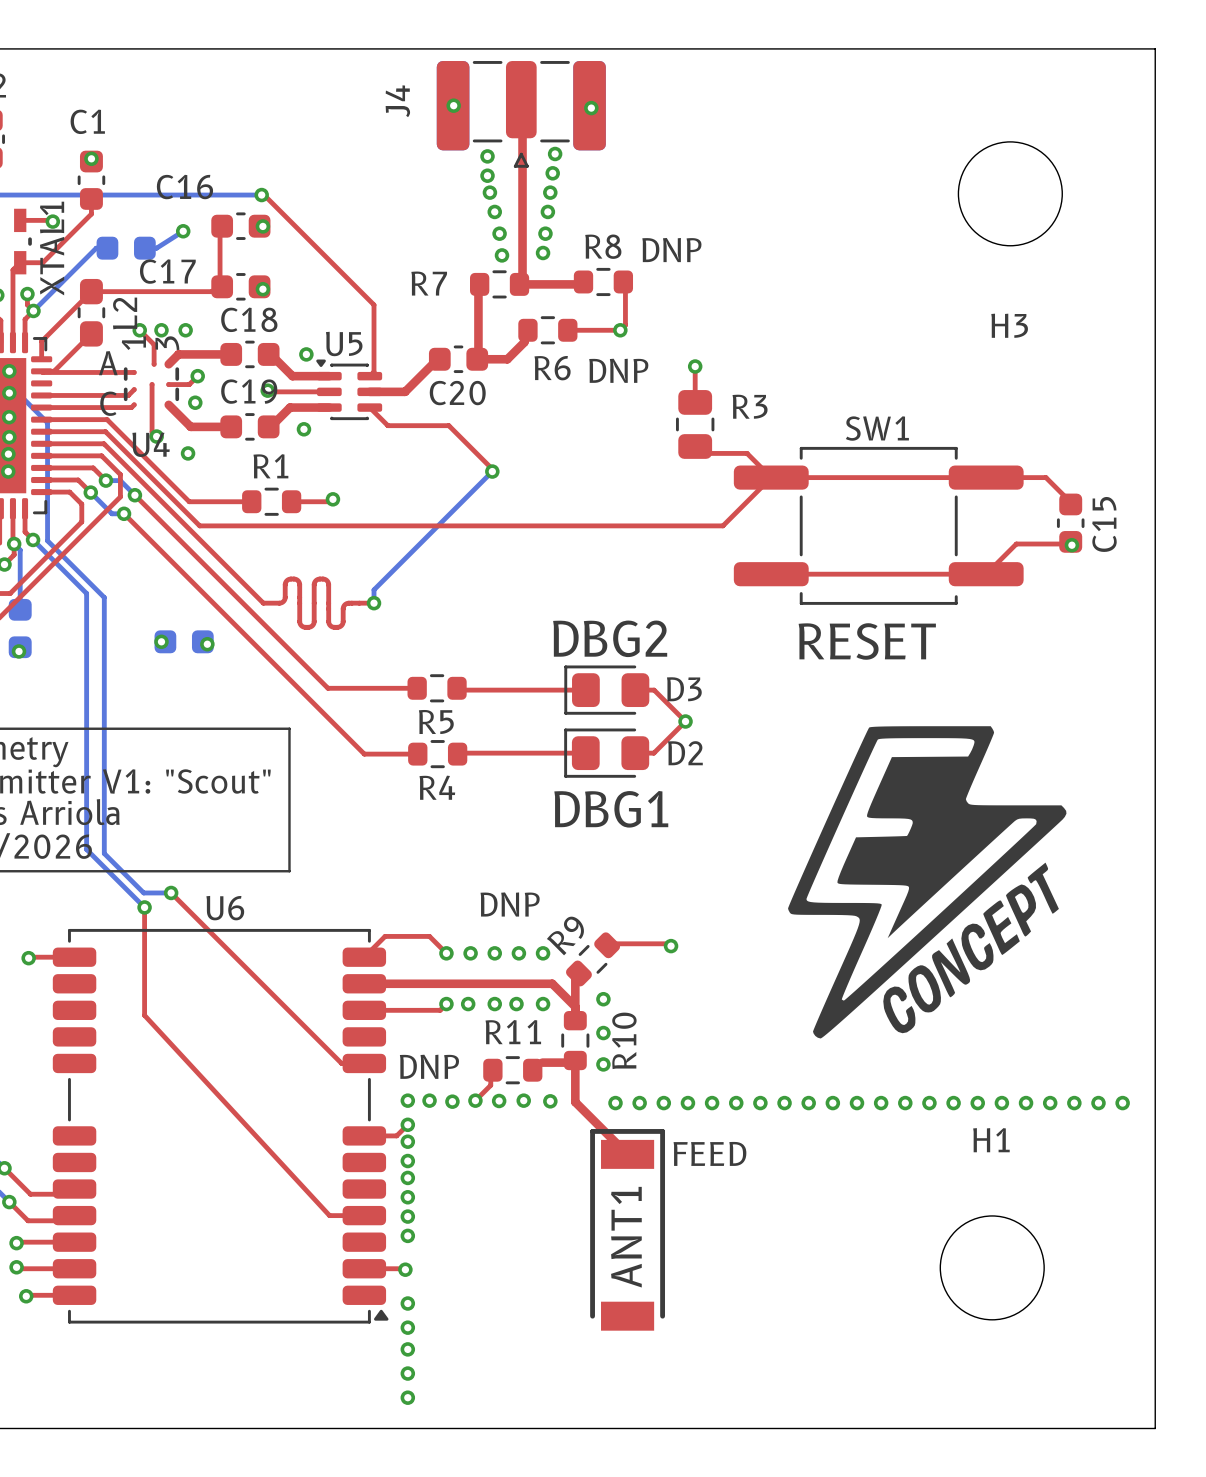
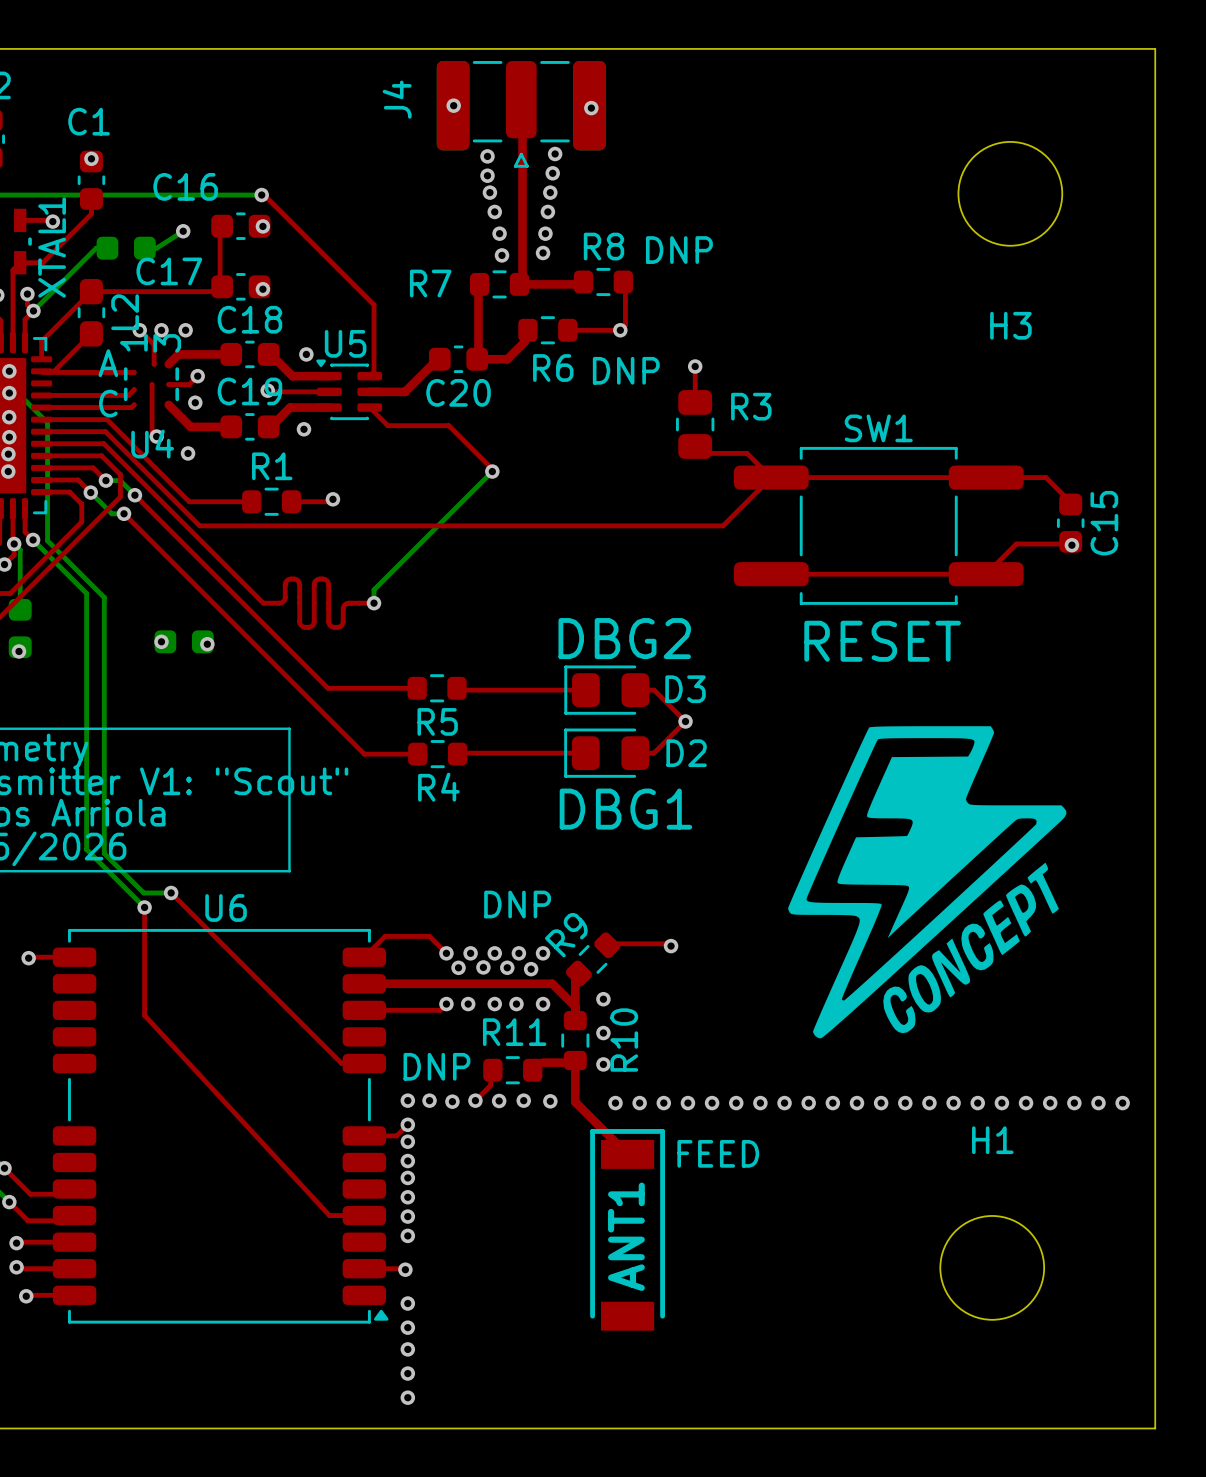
via: none -> (458, 967)
via: none -> (483, 967)
via: none -> (507, 967)
via: none -> (531, 969)

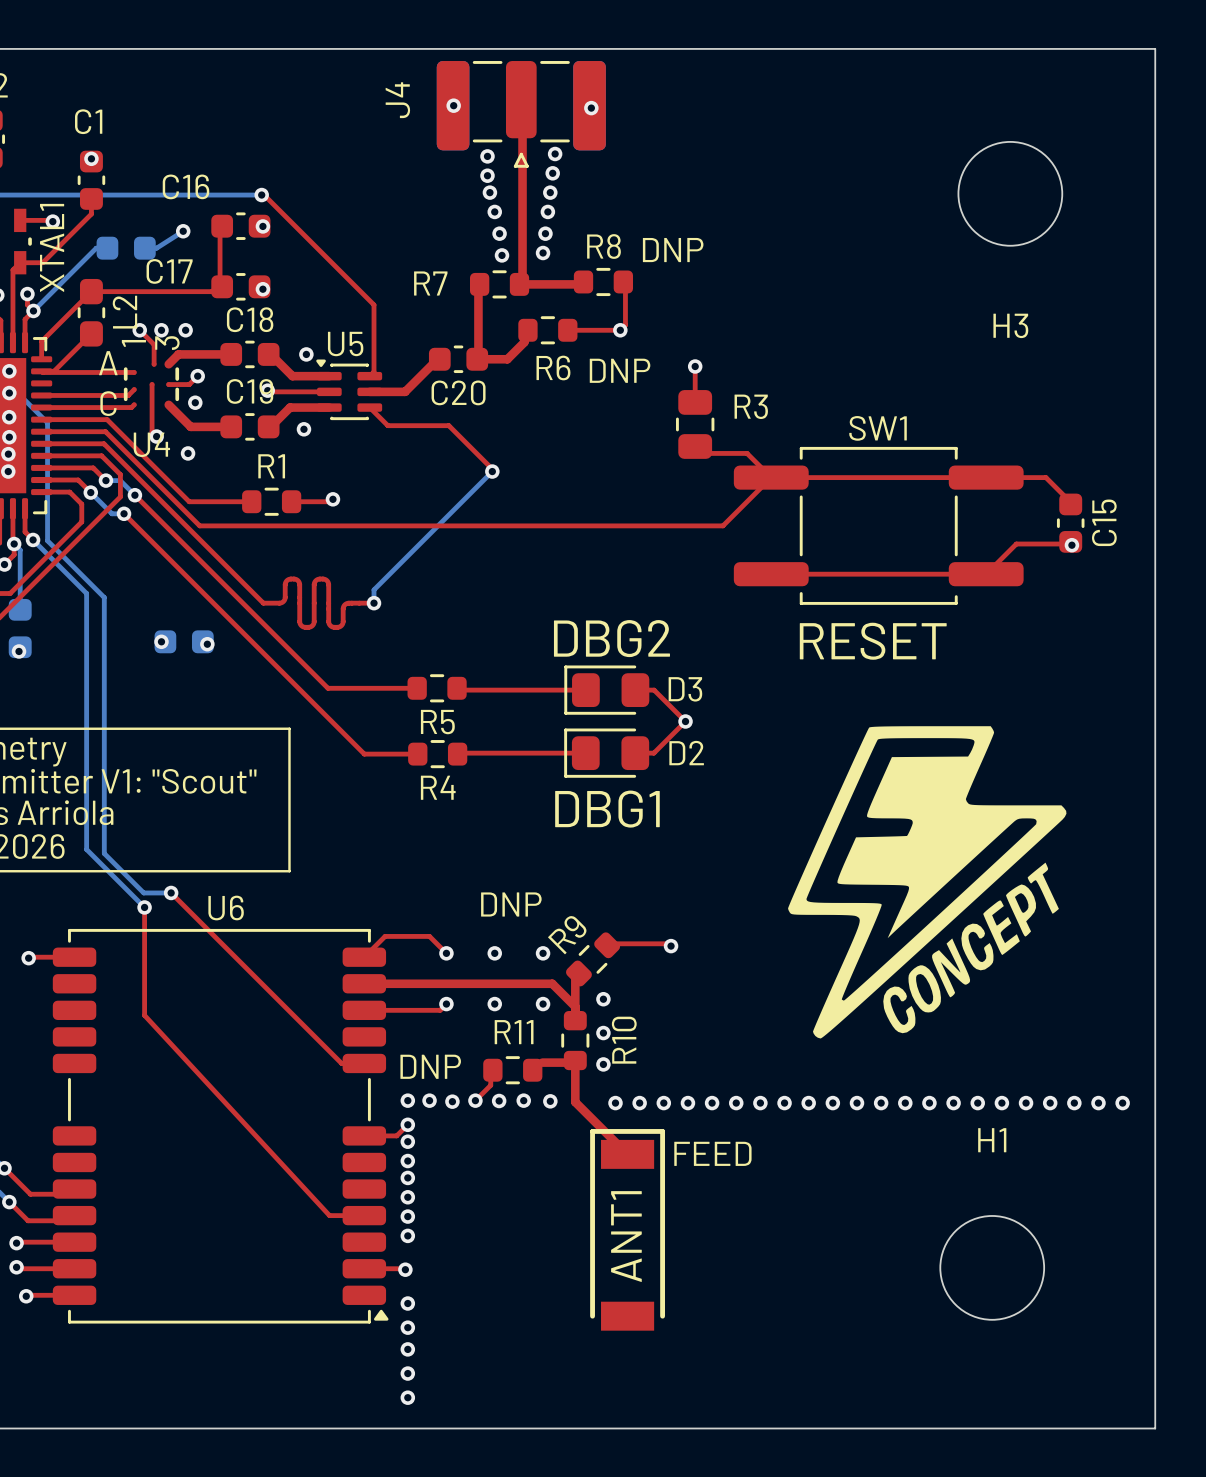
via: (470, 953) -> none
via: (518, 953) -> none
via: (458, 967) -> none
via: (483, 967) -> none
via: (507, 967) -> none
via: (531, 969) -> none
via: (468, 1004) -> none
via: (516, 1004) -> none

